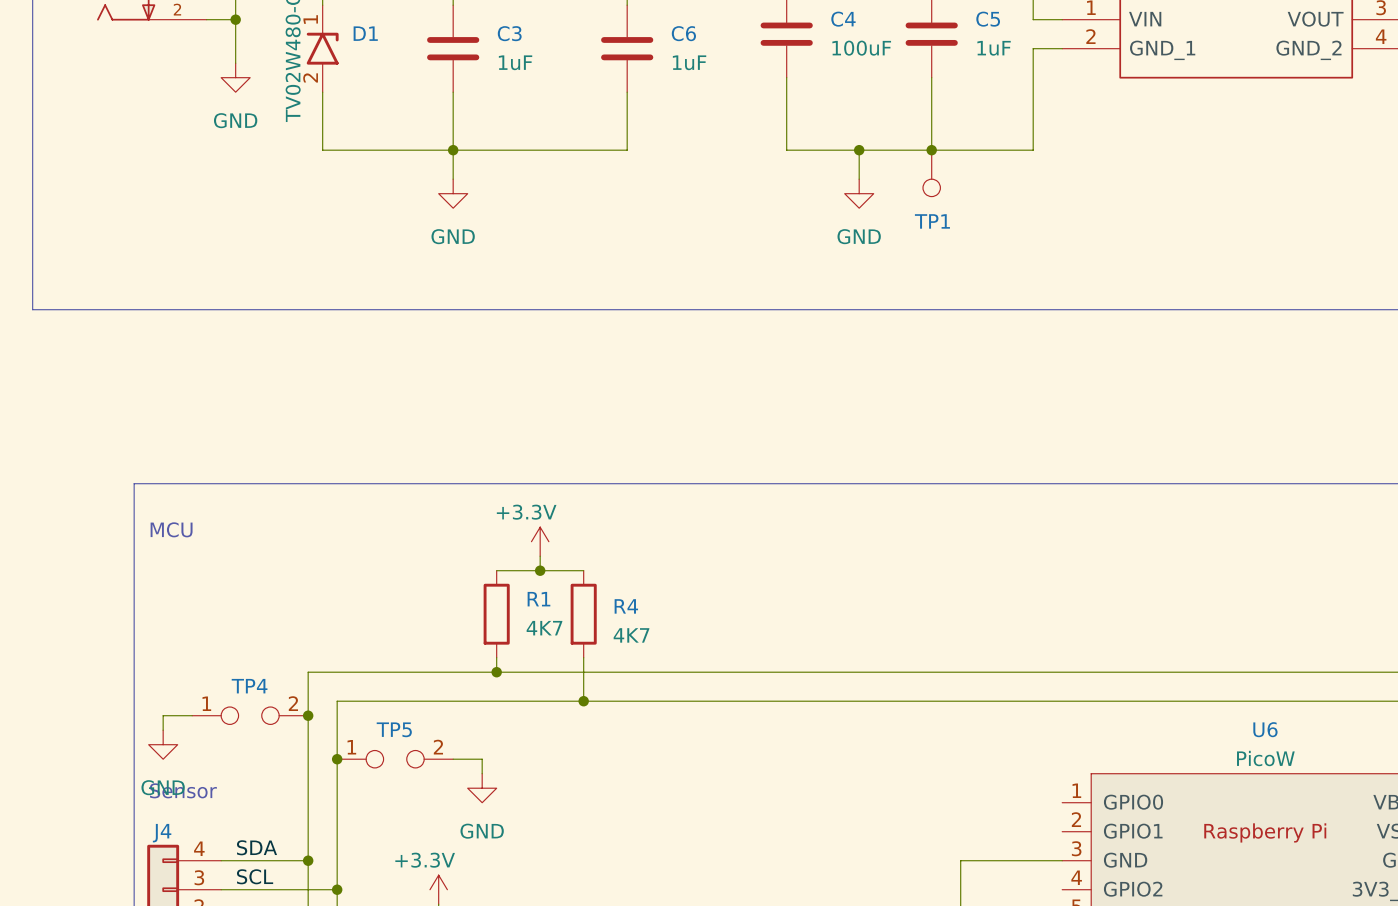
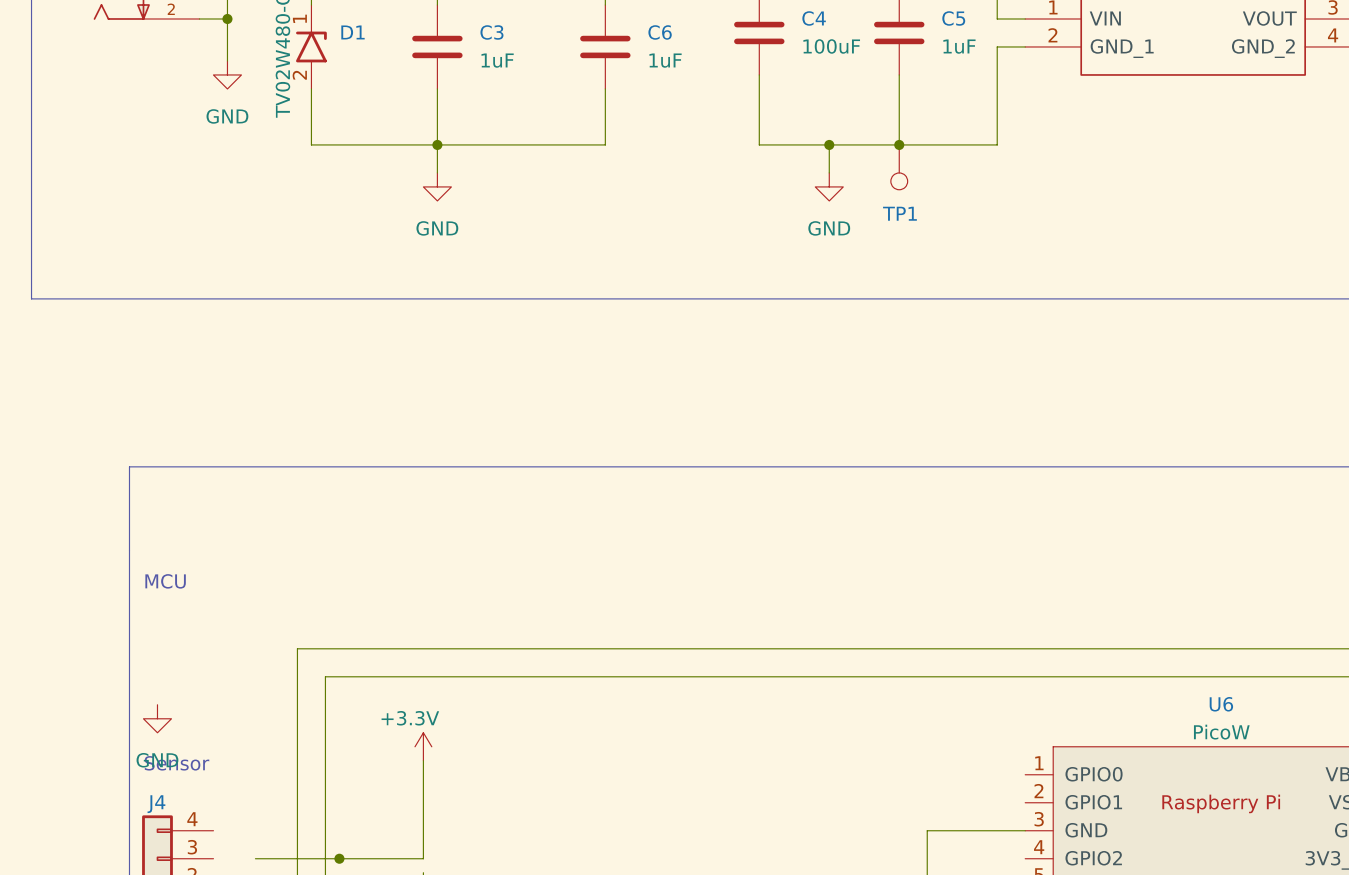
text position: MCU (171, 529) -> MCU (165, 581)
power symbol: +3.3V (540, 541) -> none
wire: (540, 556) (540, 570) -> none
wire: (496, 570) (583, 570) -> none
junction: (540, 570) -> none
R1: 4K7 (496, 614) -> none
R4: 4K7 (583, 614) -> none
wire: (496, 657) (496, 672) -> none
wire: (583, 657) (583, 701) -> none
junction: (496, 672) -> none
junction: (583, 701) -> none
wire: (192, 715) (163, 715) (163, 730) -> none
TP4: (250, 715) -> none
junction: (308, 715) -> none
junction: (337, 759) -> none
TP5: (395, 759) -> none
wire: (453, 759) (482, 759) (482, 773) -> none
wire: none -> (423, 760) (423, 858) (325, 858)
power symbol: GND (482, 788) -> none
label: SDA (257, 847) -> none
wire: (221, 860) (308, 860) -> none
junction: (308, 860) -> none
label: SCL (255, 876) -> none
wire: (221, 889) (264, 889) -> none
junction position: (337, 889) -> (339, 858)
power symbol position: +3.3V (438, 889) -> +3.3V (423, 746)

